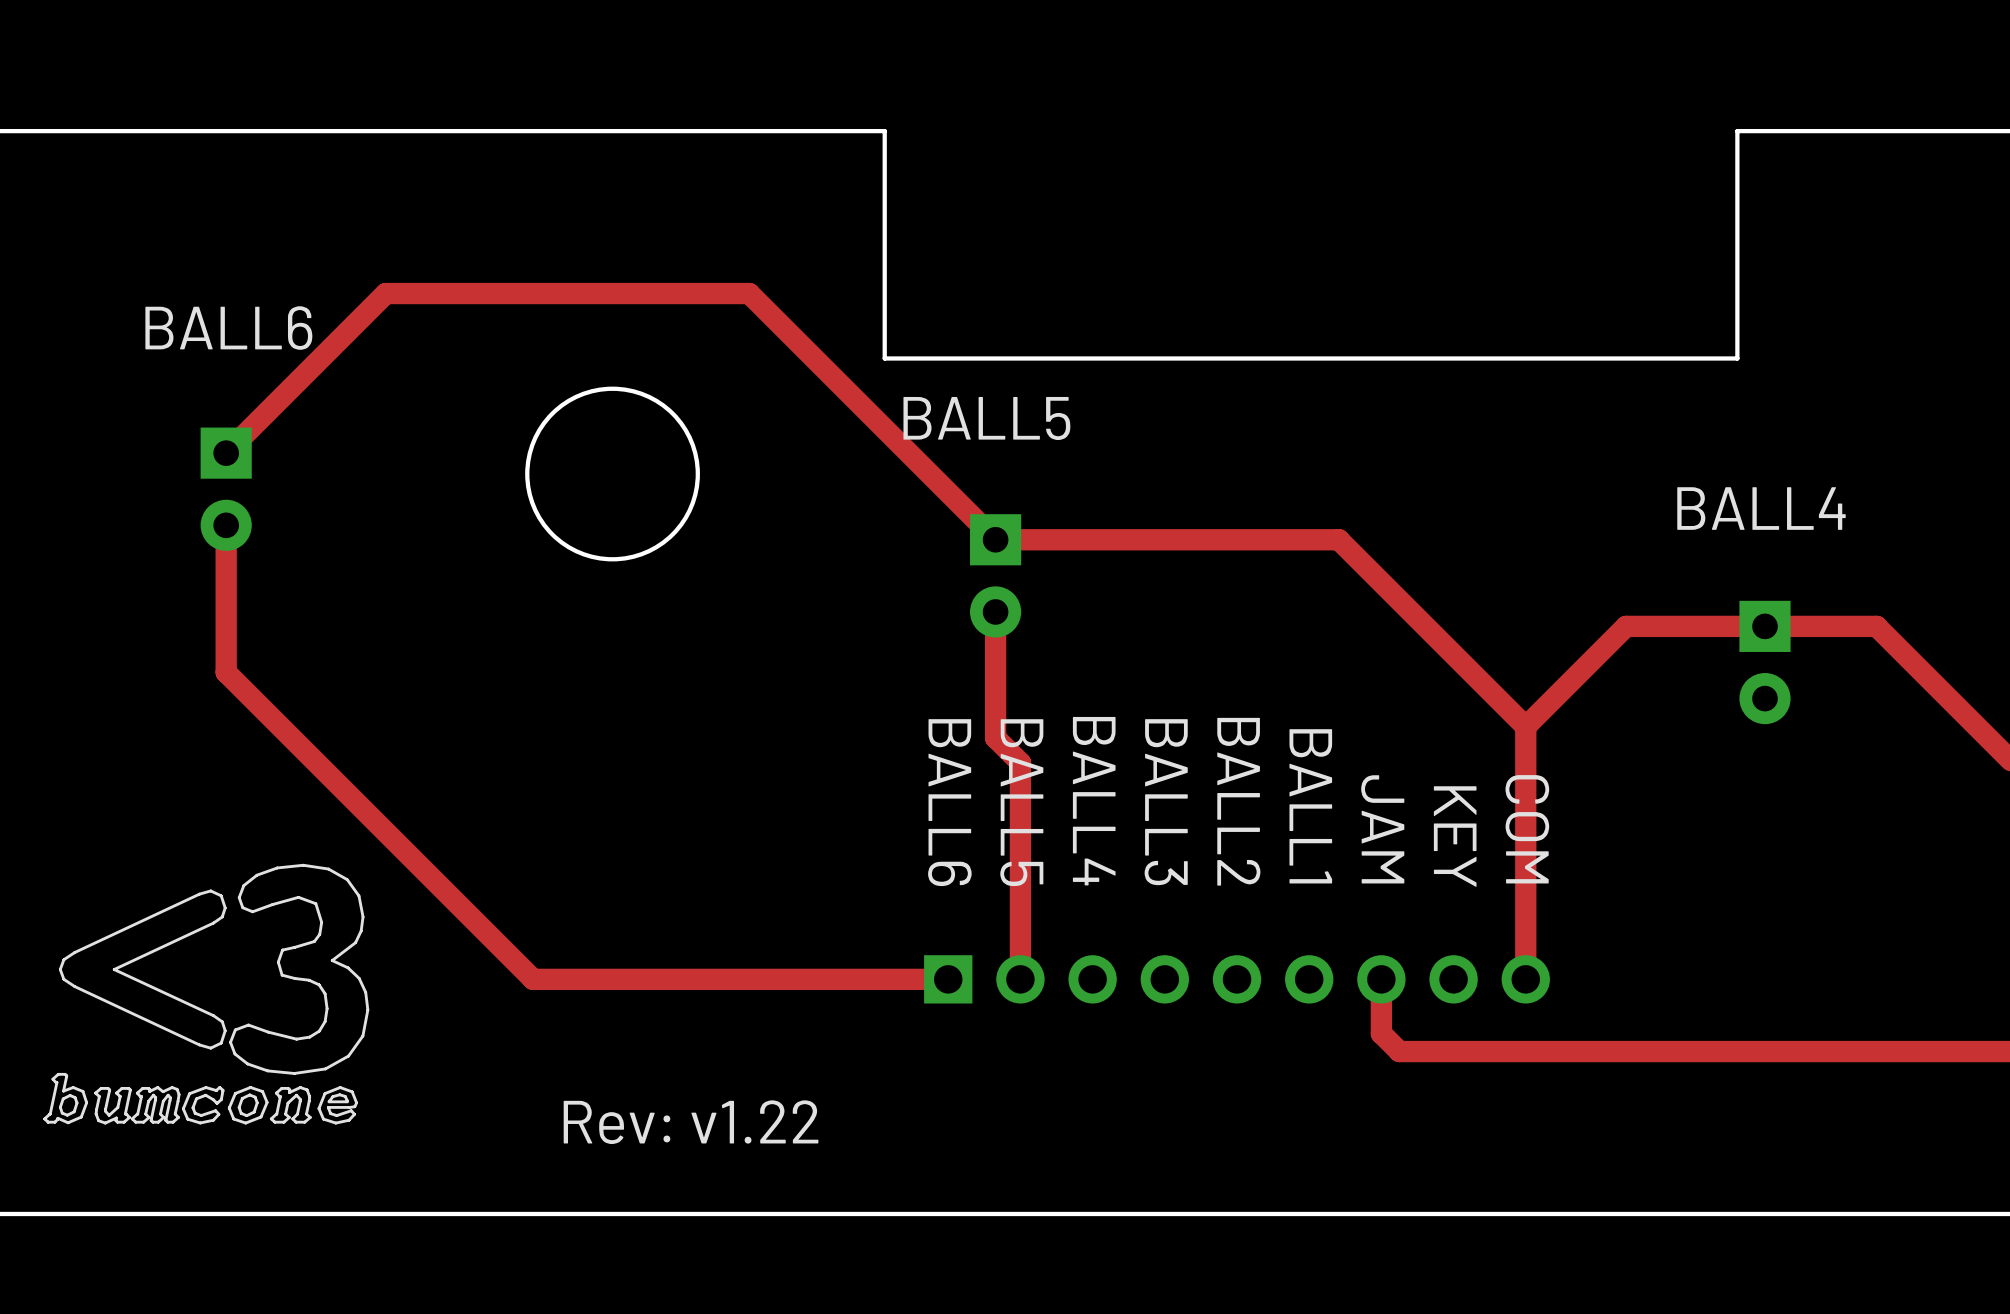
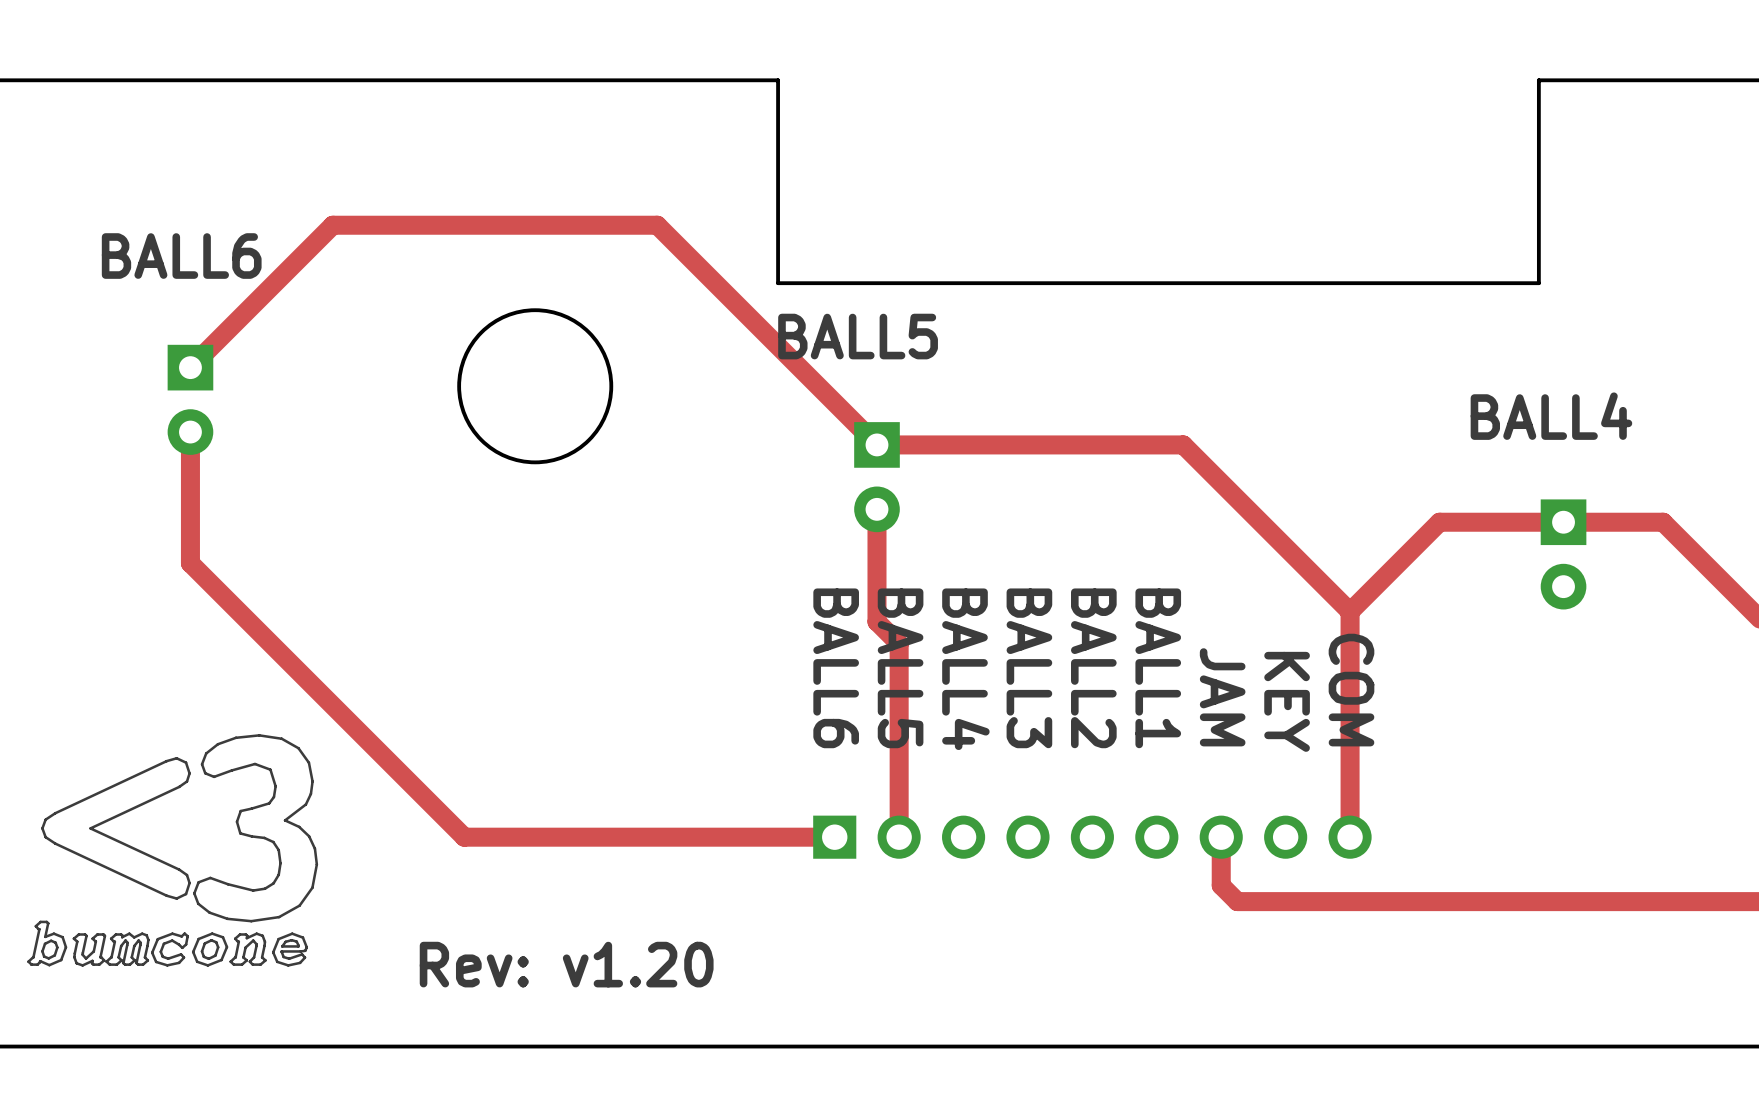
text: Rev: v1.22 (691, 1122) -> Rev: v1.20 (566, 964)

